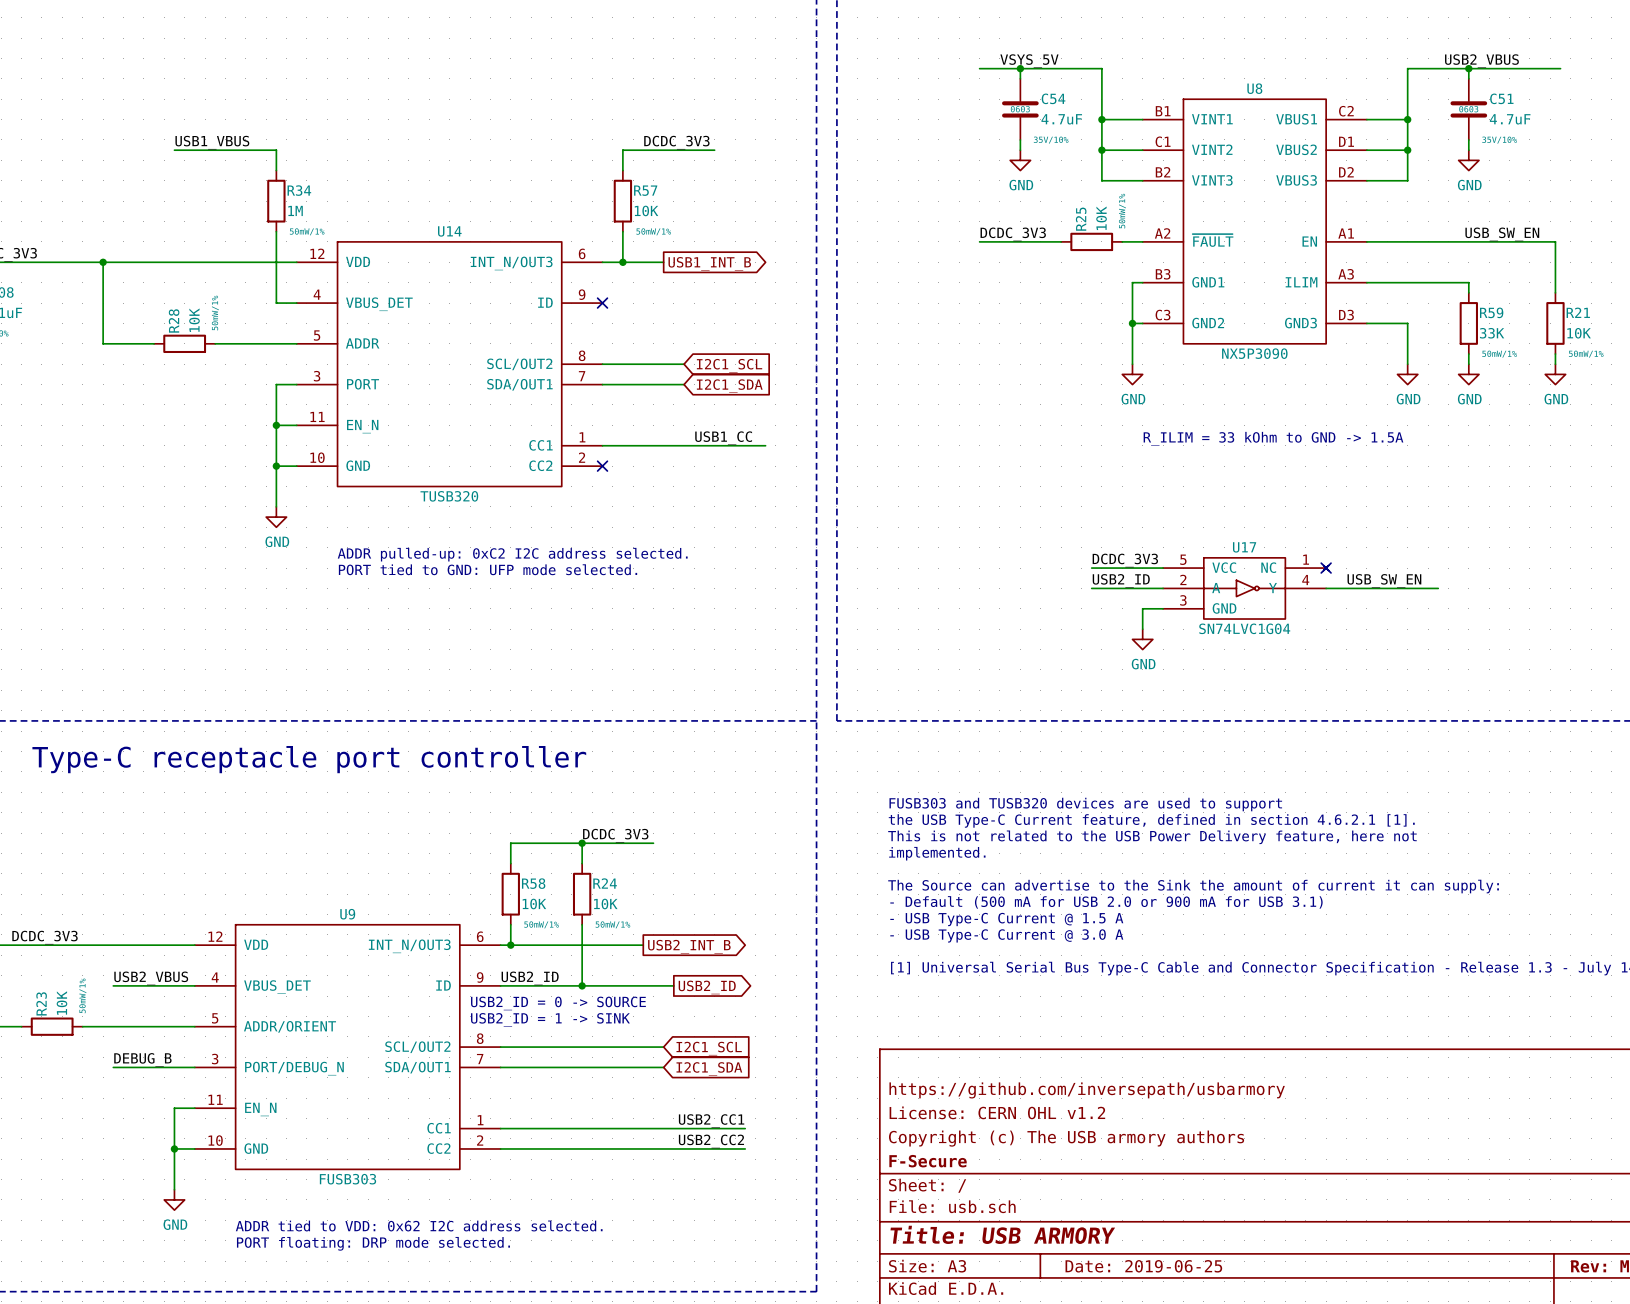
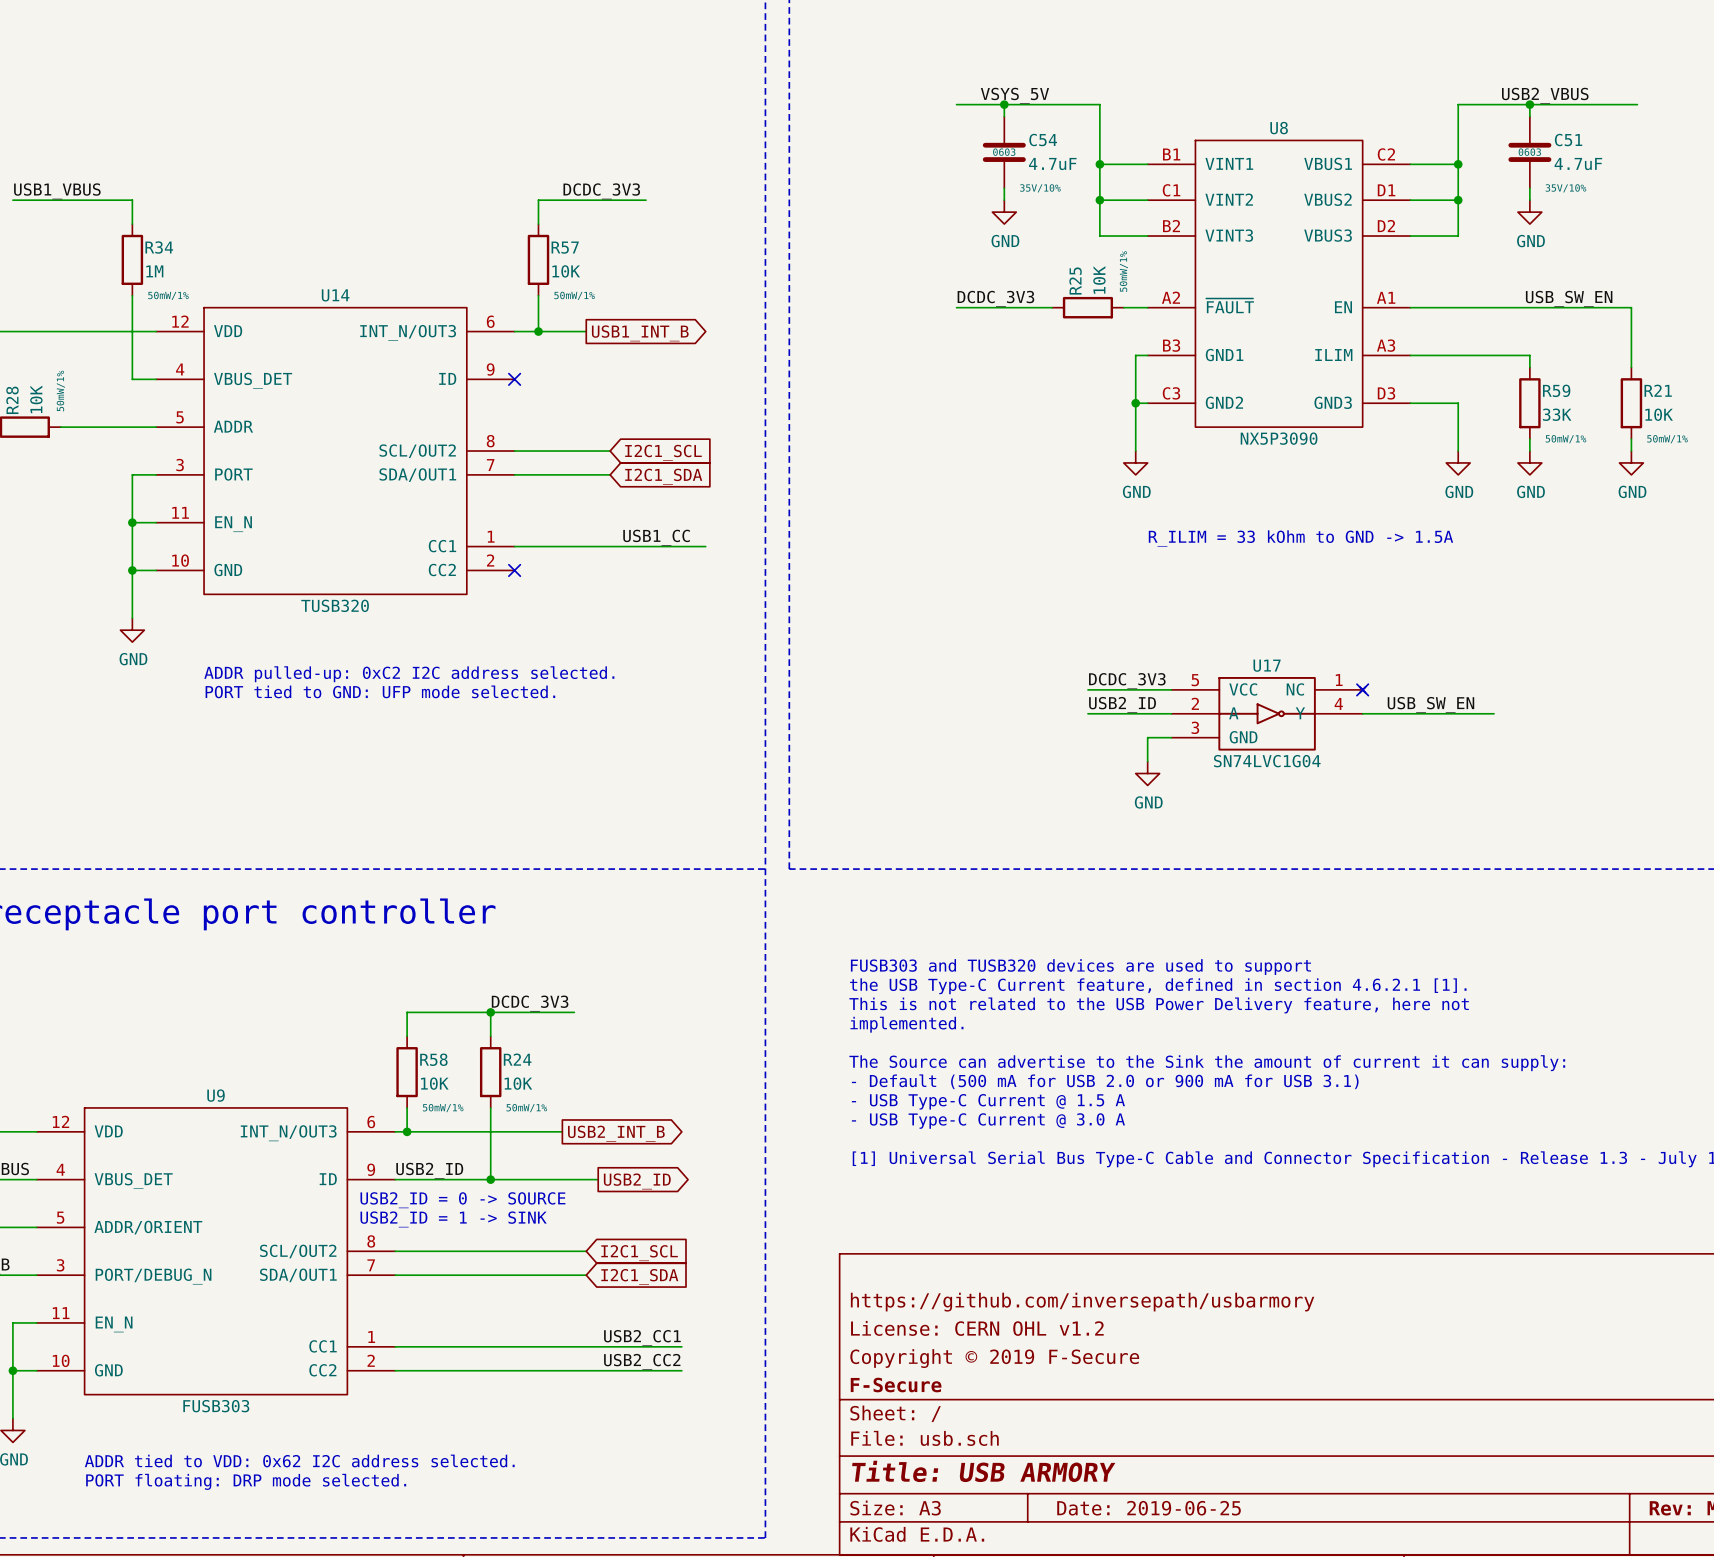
title block: Copyright (c) The USB armory authors (1066, 1138) -> Copyright © 2019 F-Secure (994, 1358)

